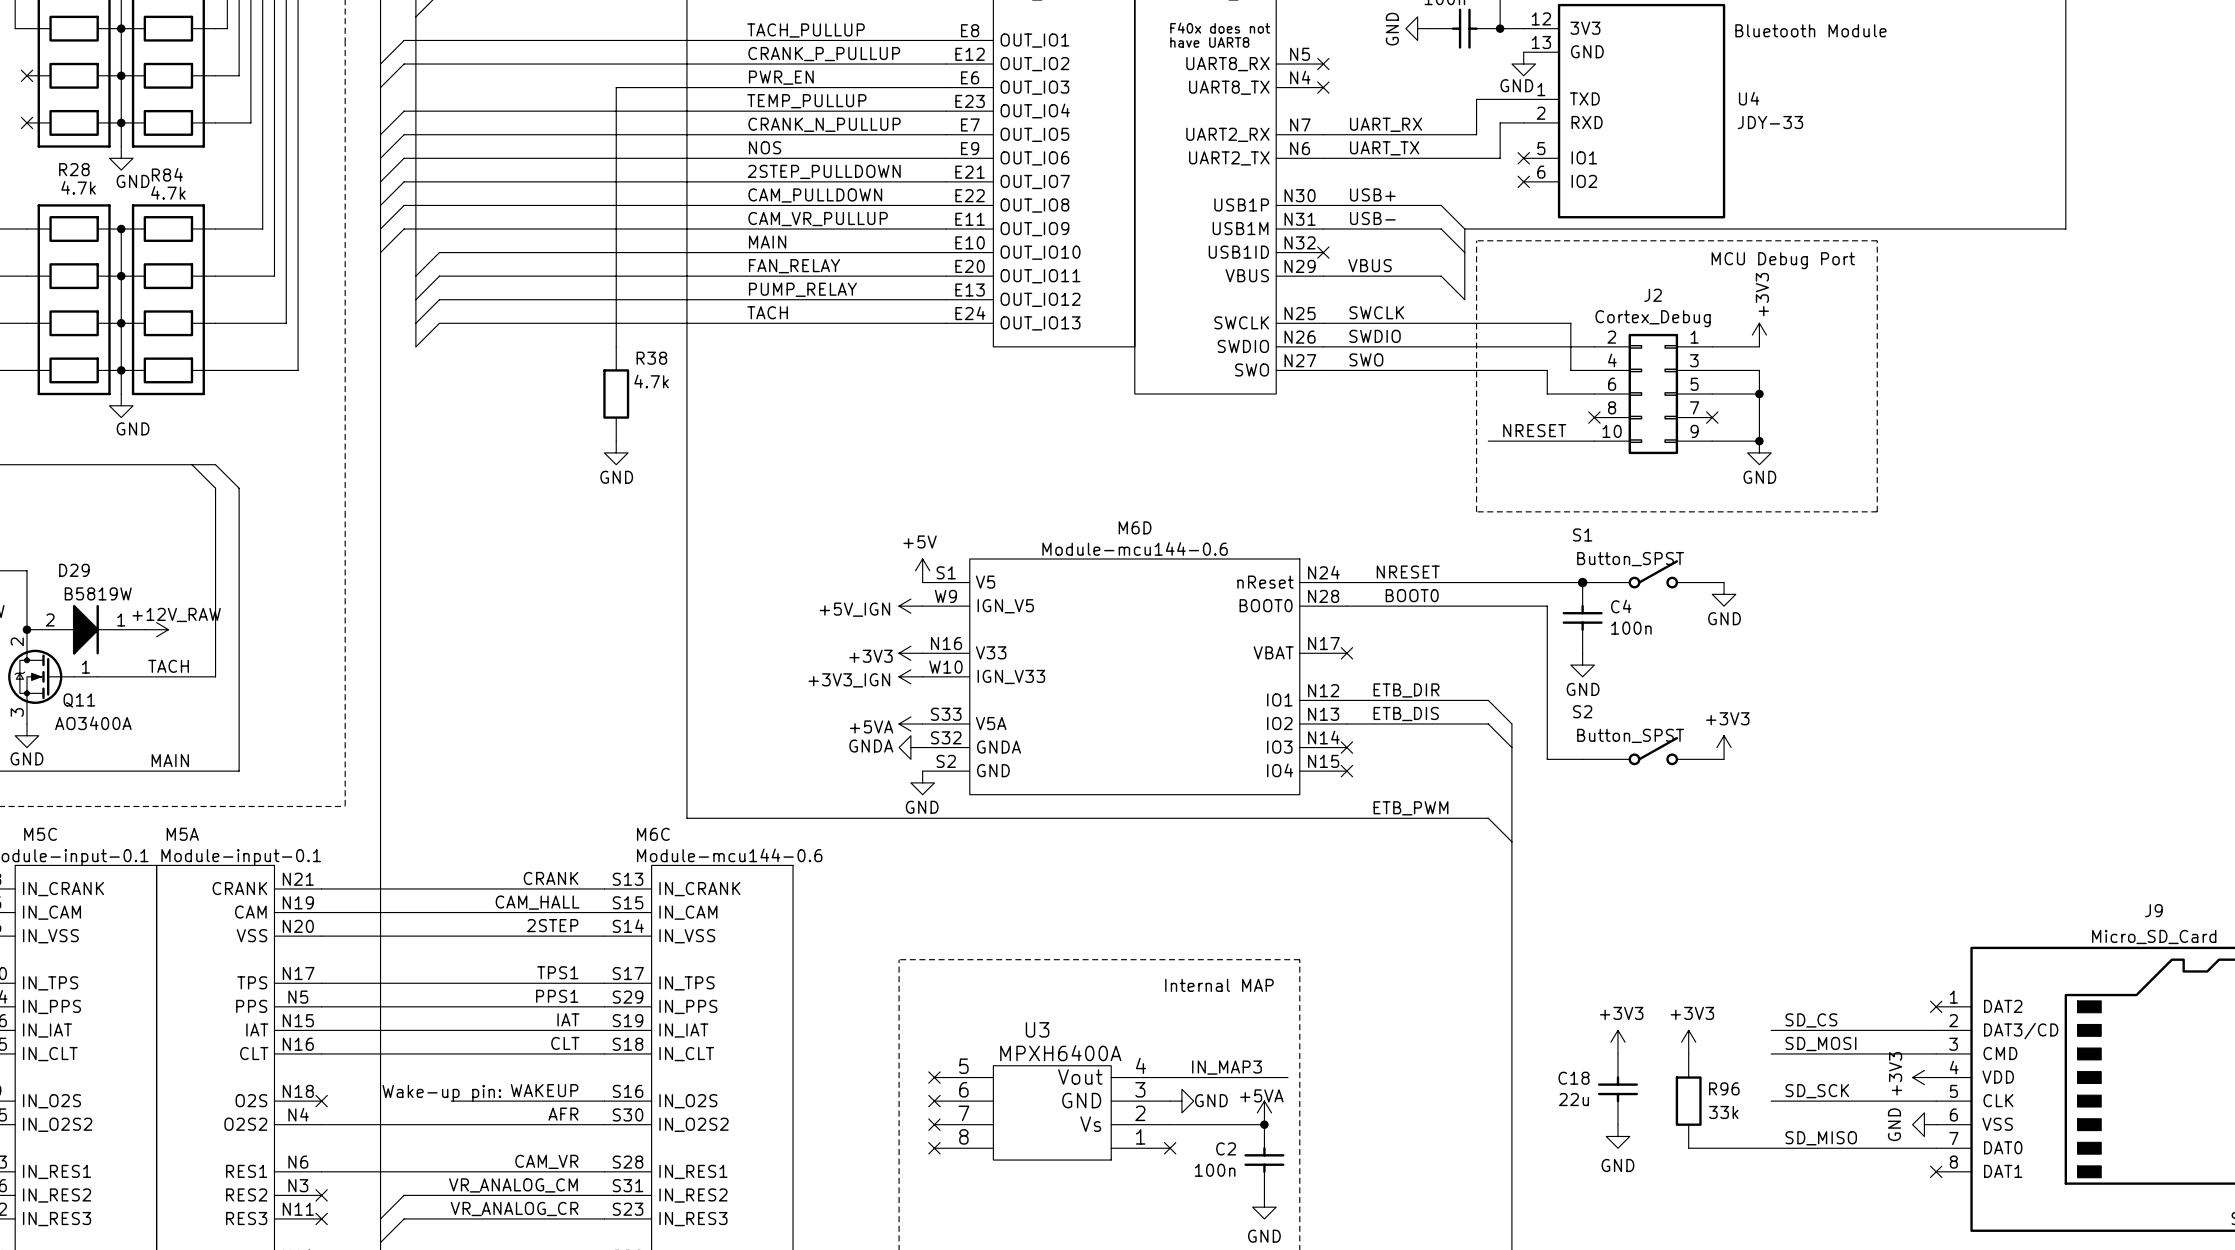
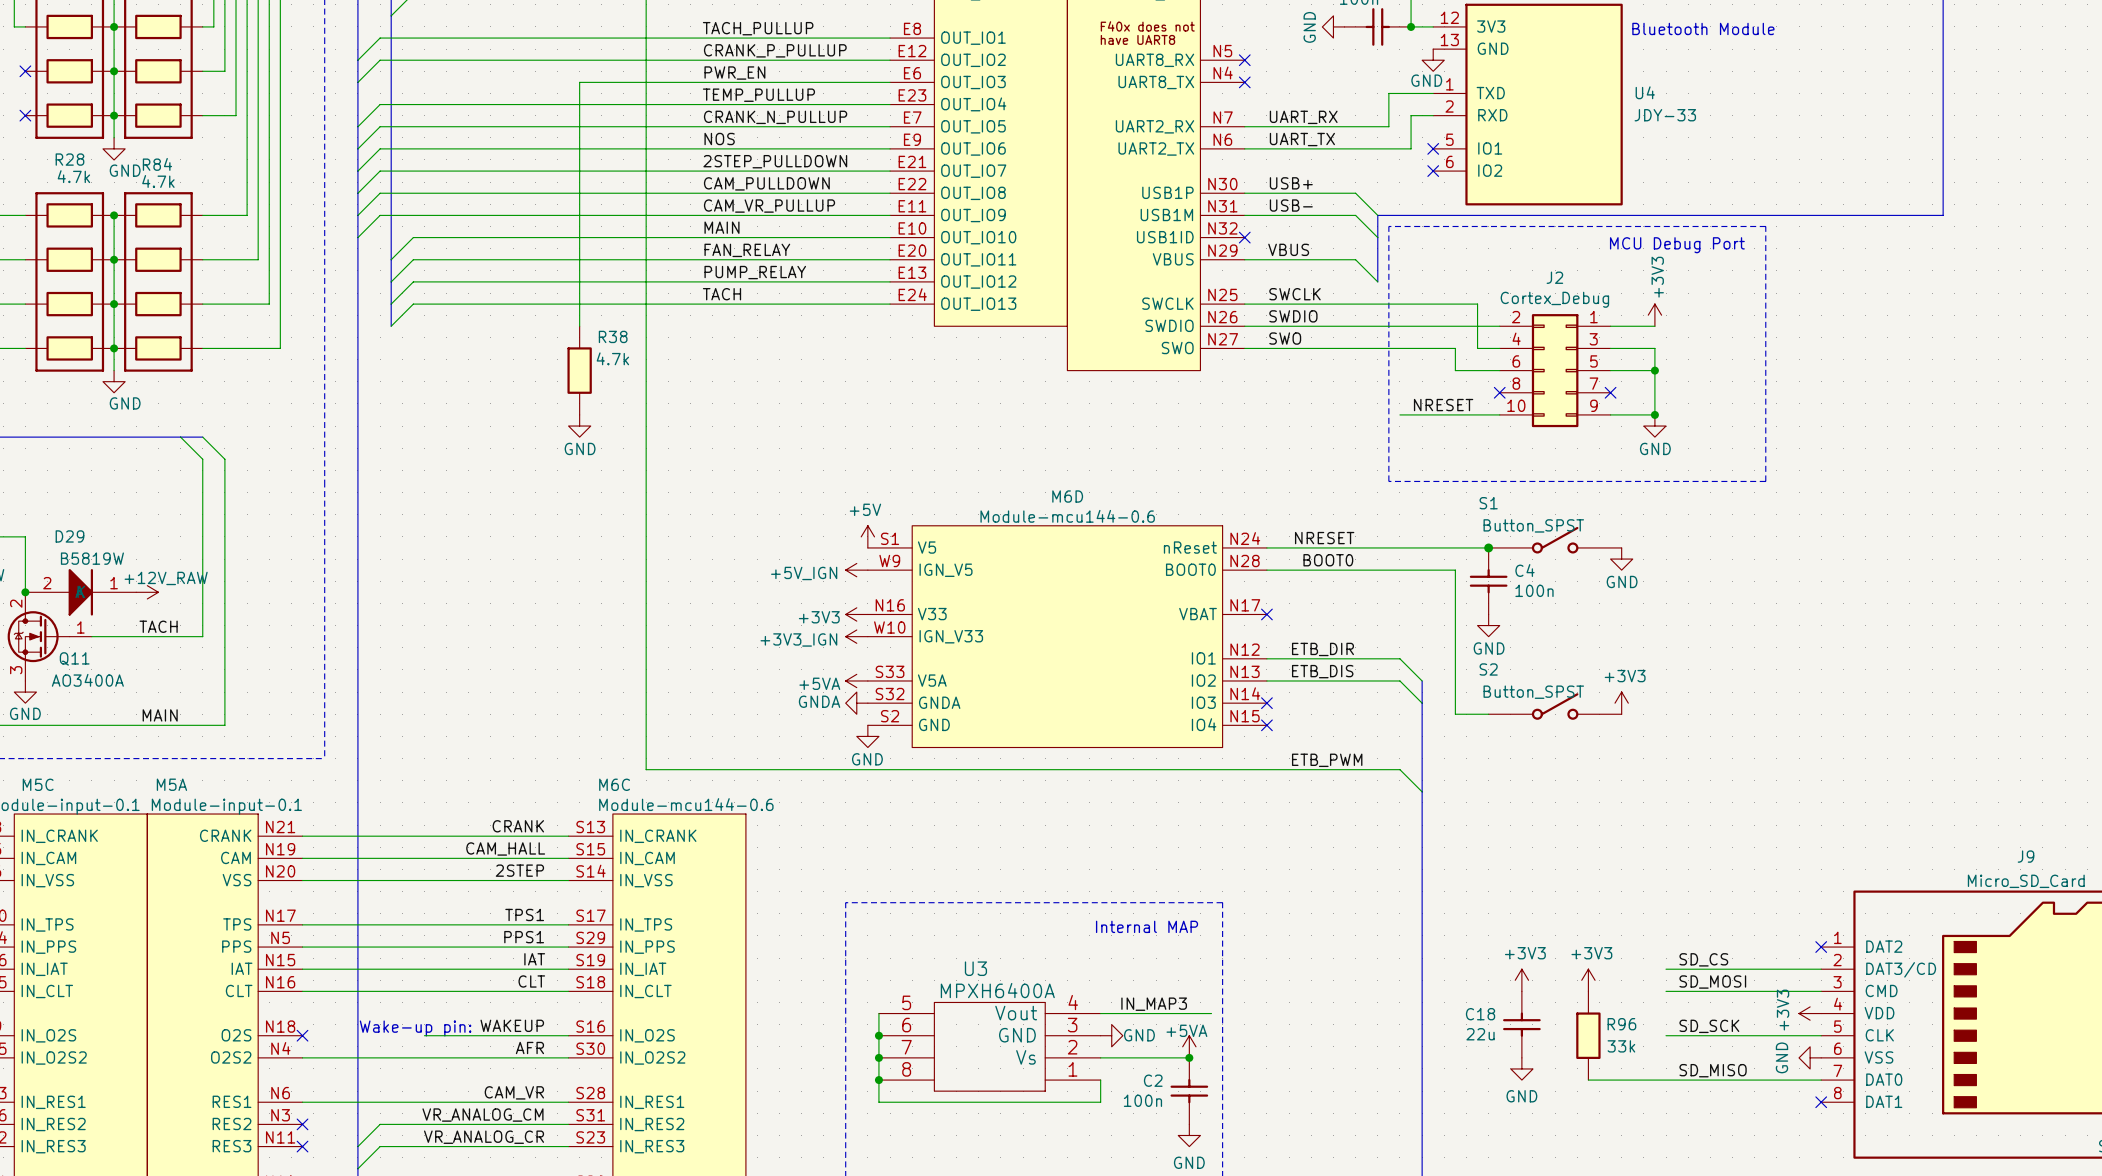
wire: none -> (878, 1013) (878, 1102) (1100, 1102) (1100, 1080)
no-connect mark: (934, 1077) -> none
no-connect mark: (934, 1101) -> none
junction: none -> (878, 1035)
no-connect mark: (934, 1124) -> none
junction: none -> (878, 1057)
no-connect mark: (934, 1148) -> none
junction: none -> (878, 1080)
no-connect mark: (1170, 1148) -> none

